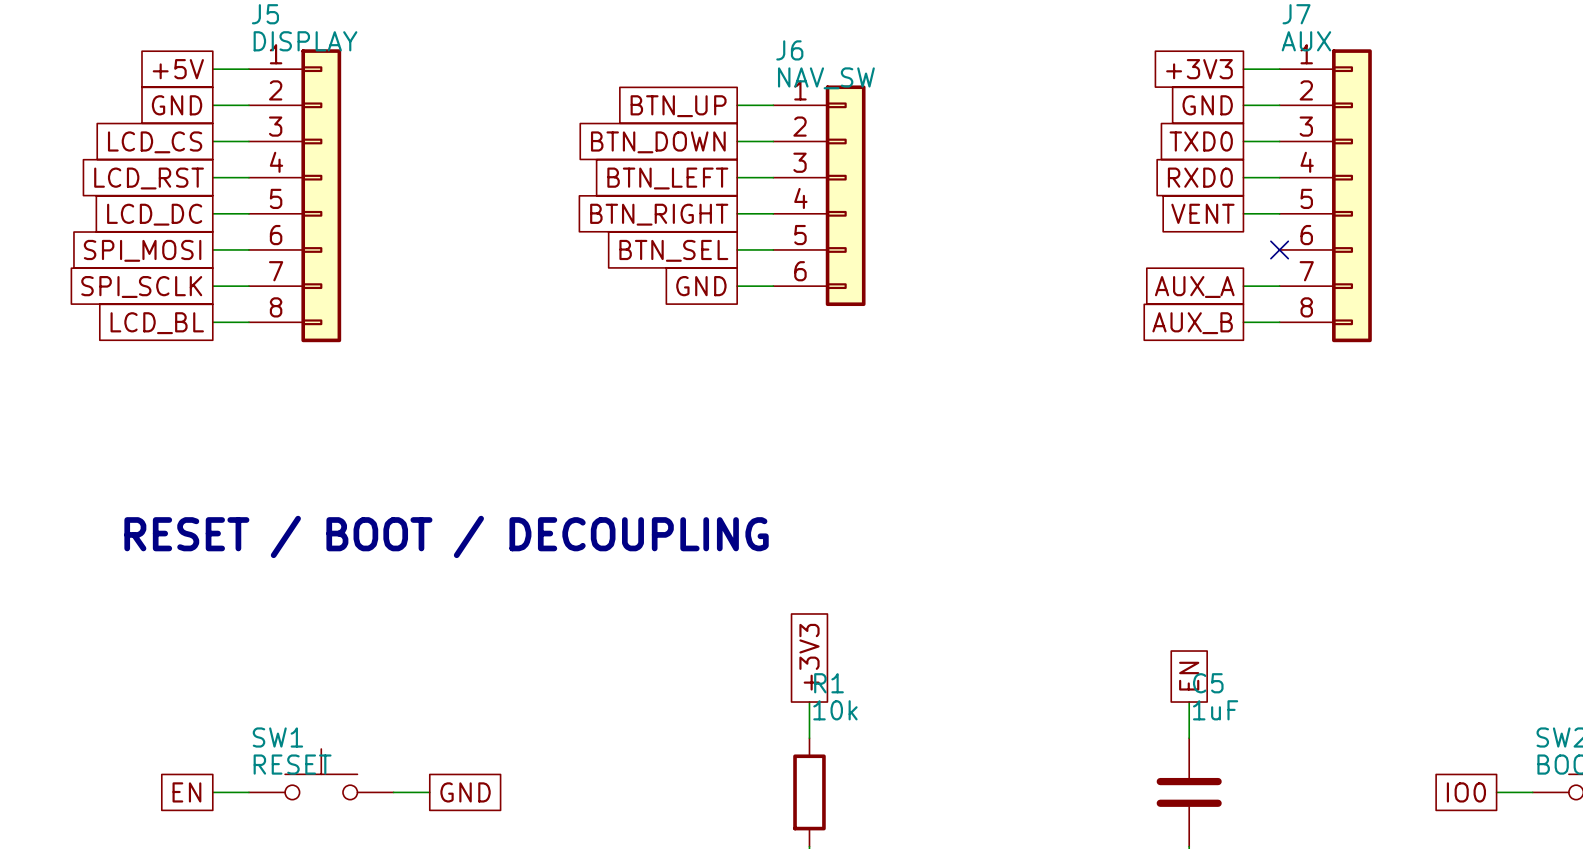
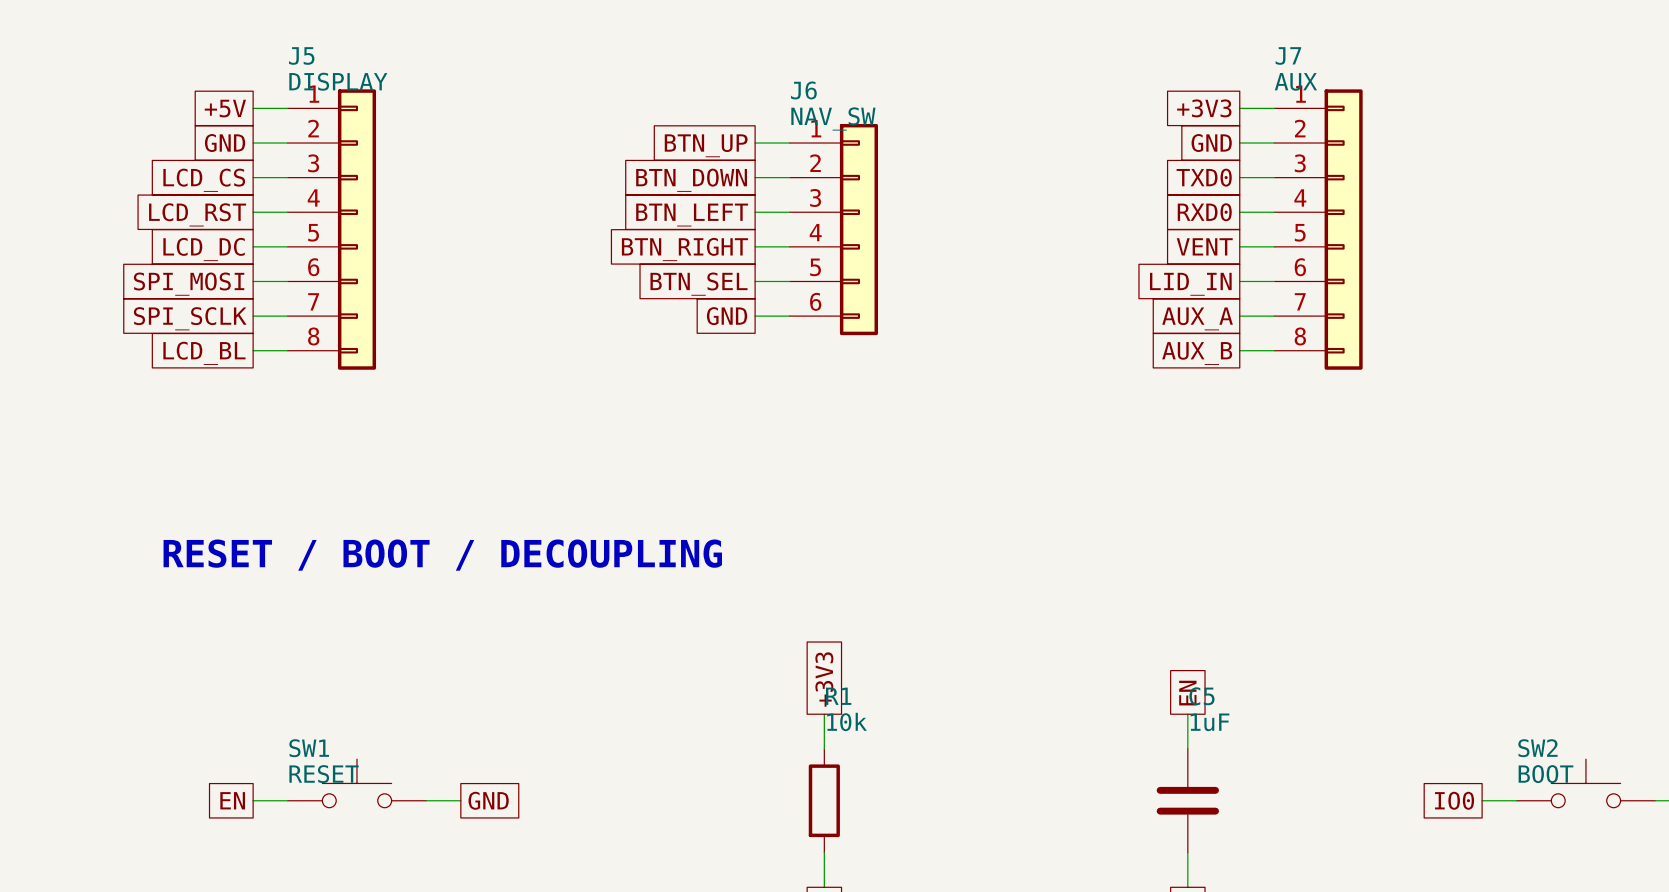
wire: none -> (1239, 281) (1274, 281)
no-connect mark: (1279, 249) -> none
global label: none -> LID_IN (1190, 284)

